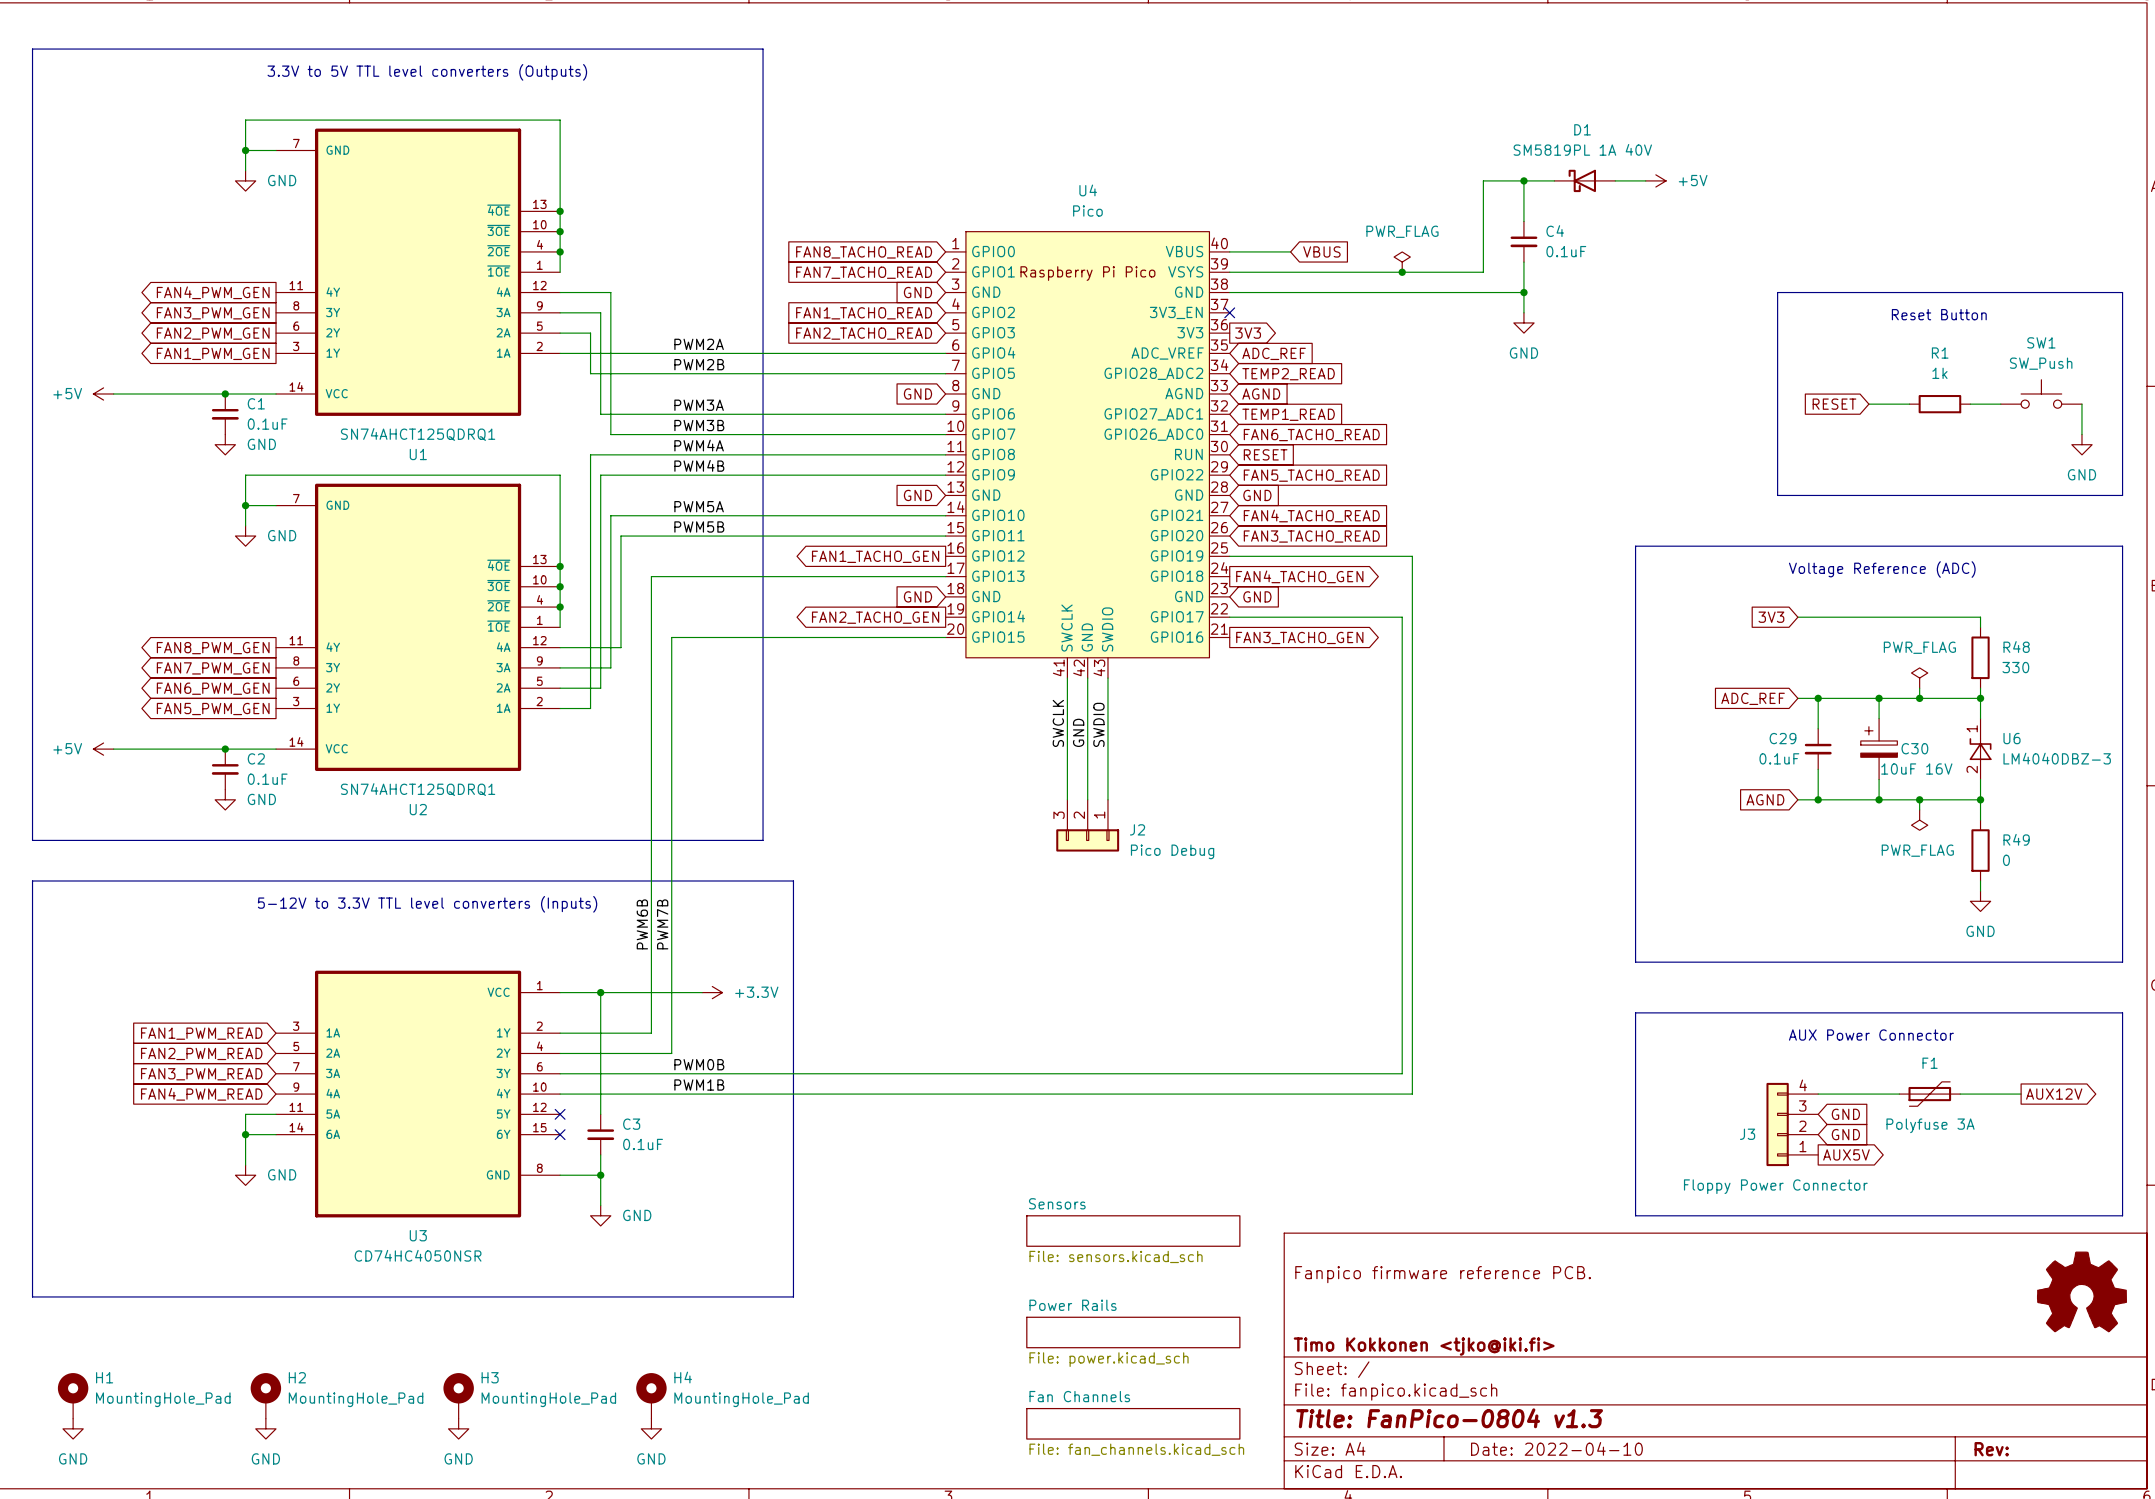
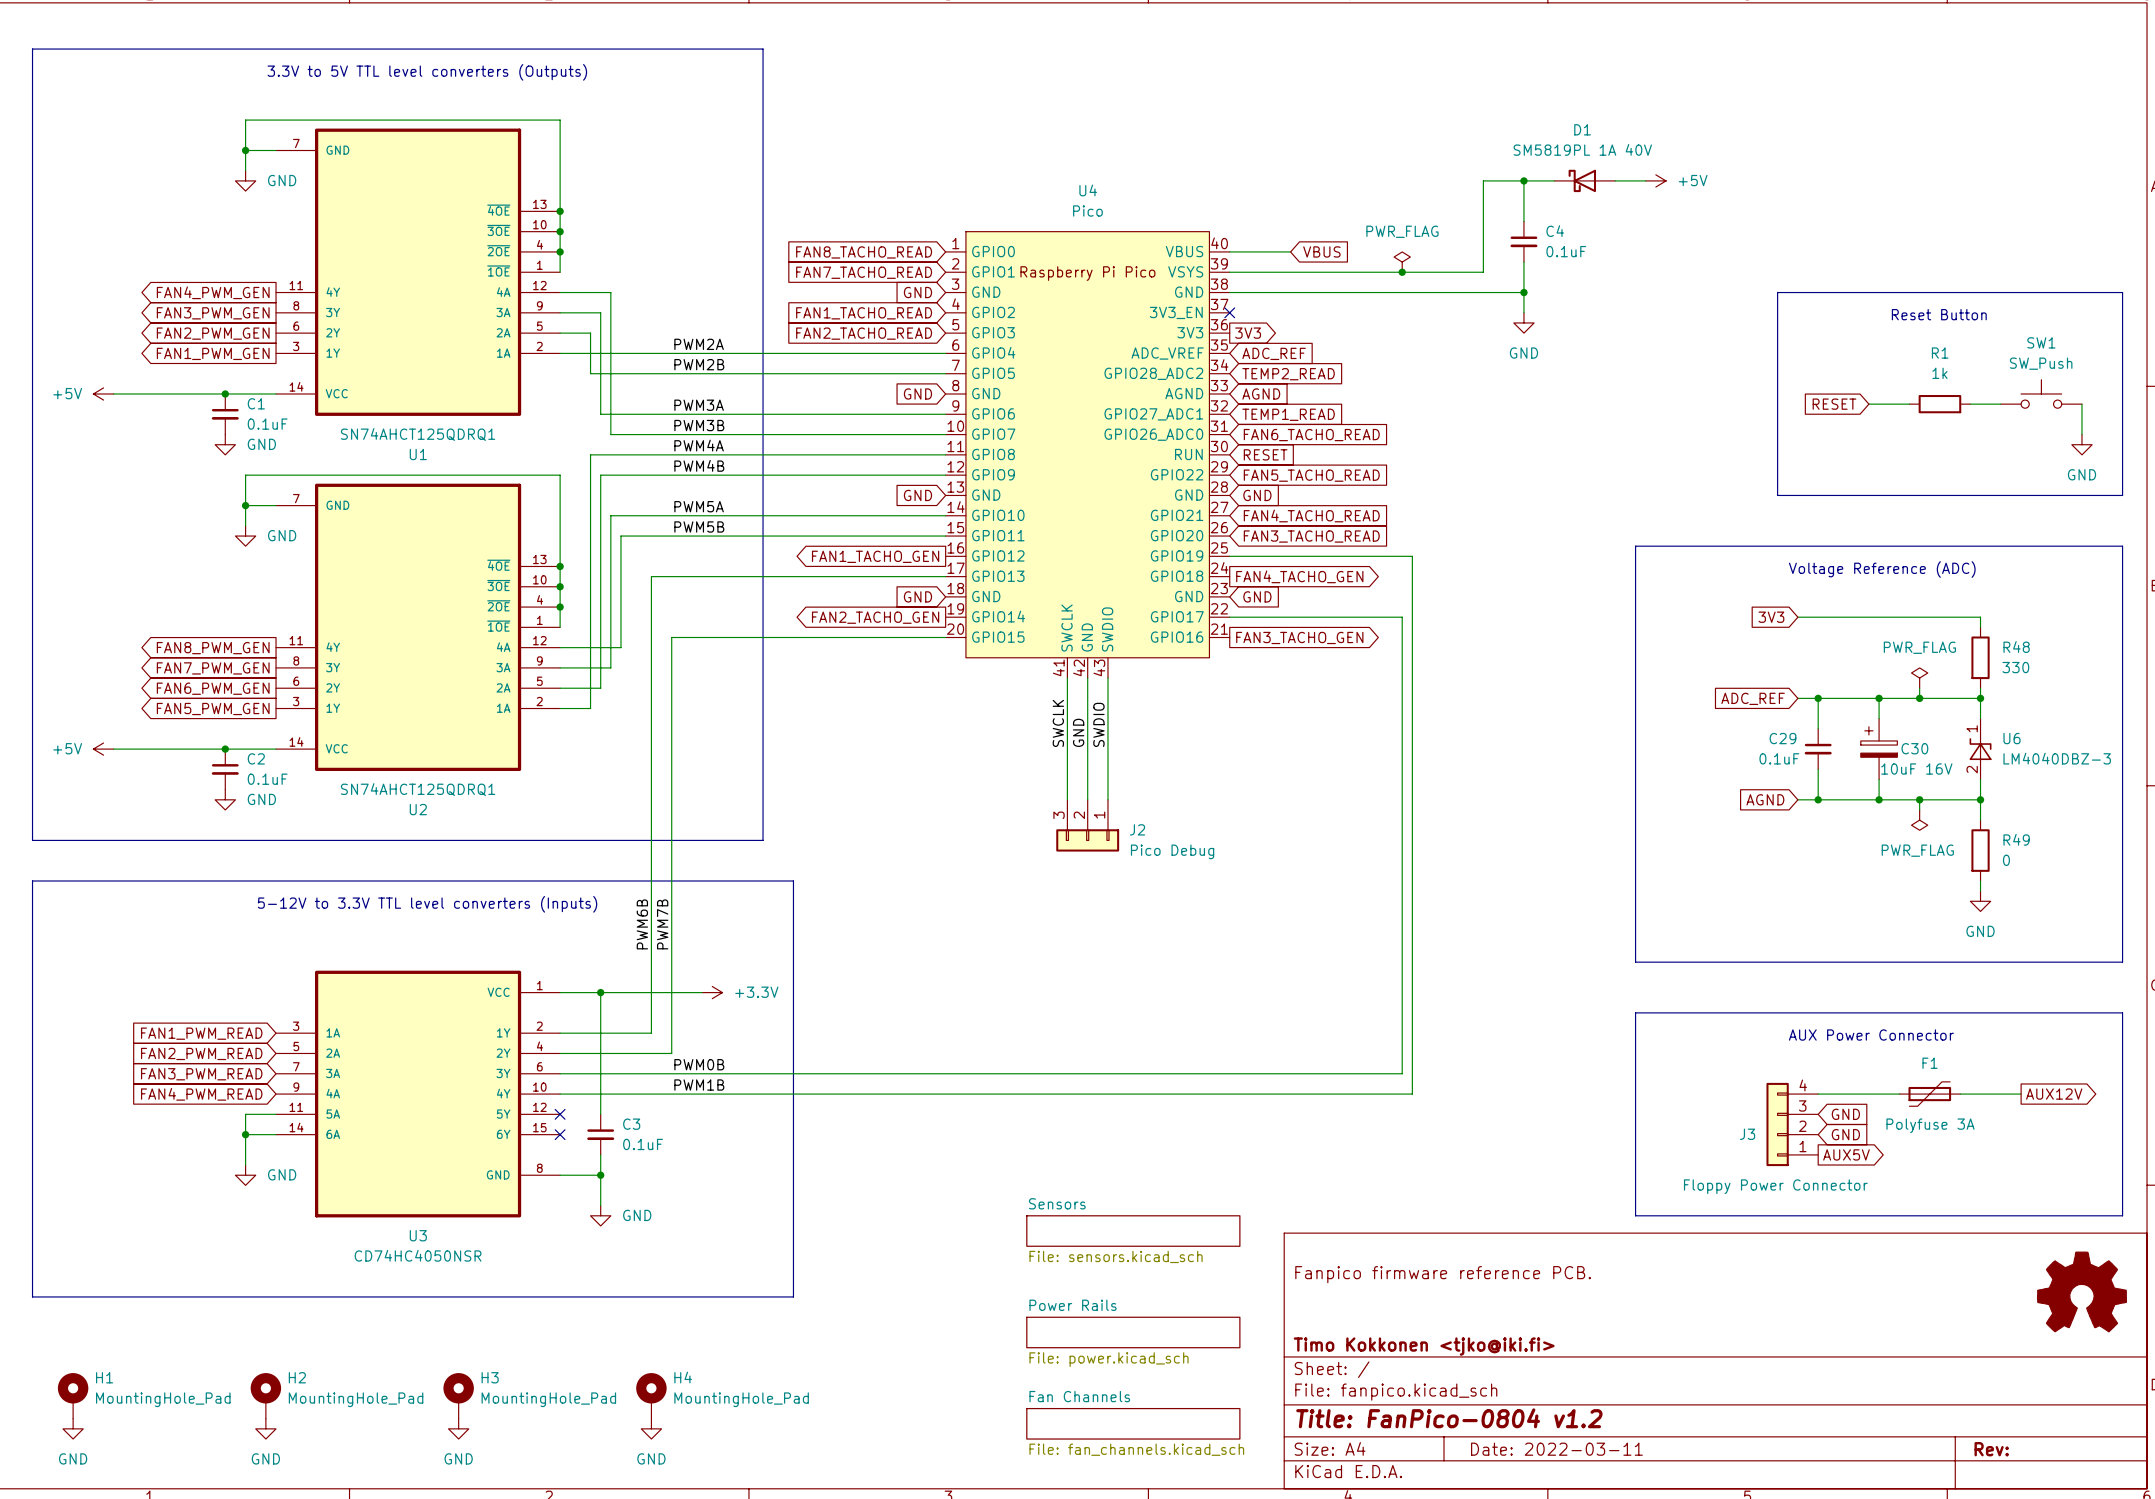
title block: Title: FanPico-0804 v1.3 (1449, 1418) -> Title: FanPico-0804 v1.2 (1449, 1418)
title block: Date: 2022-04-10 (1556, 1448) -> Date: 2022-03-11 (1556, 1449)

